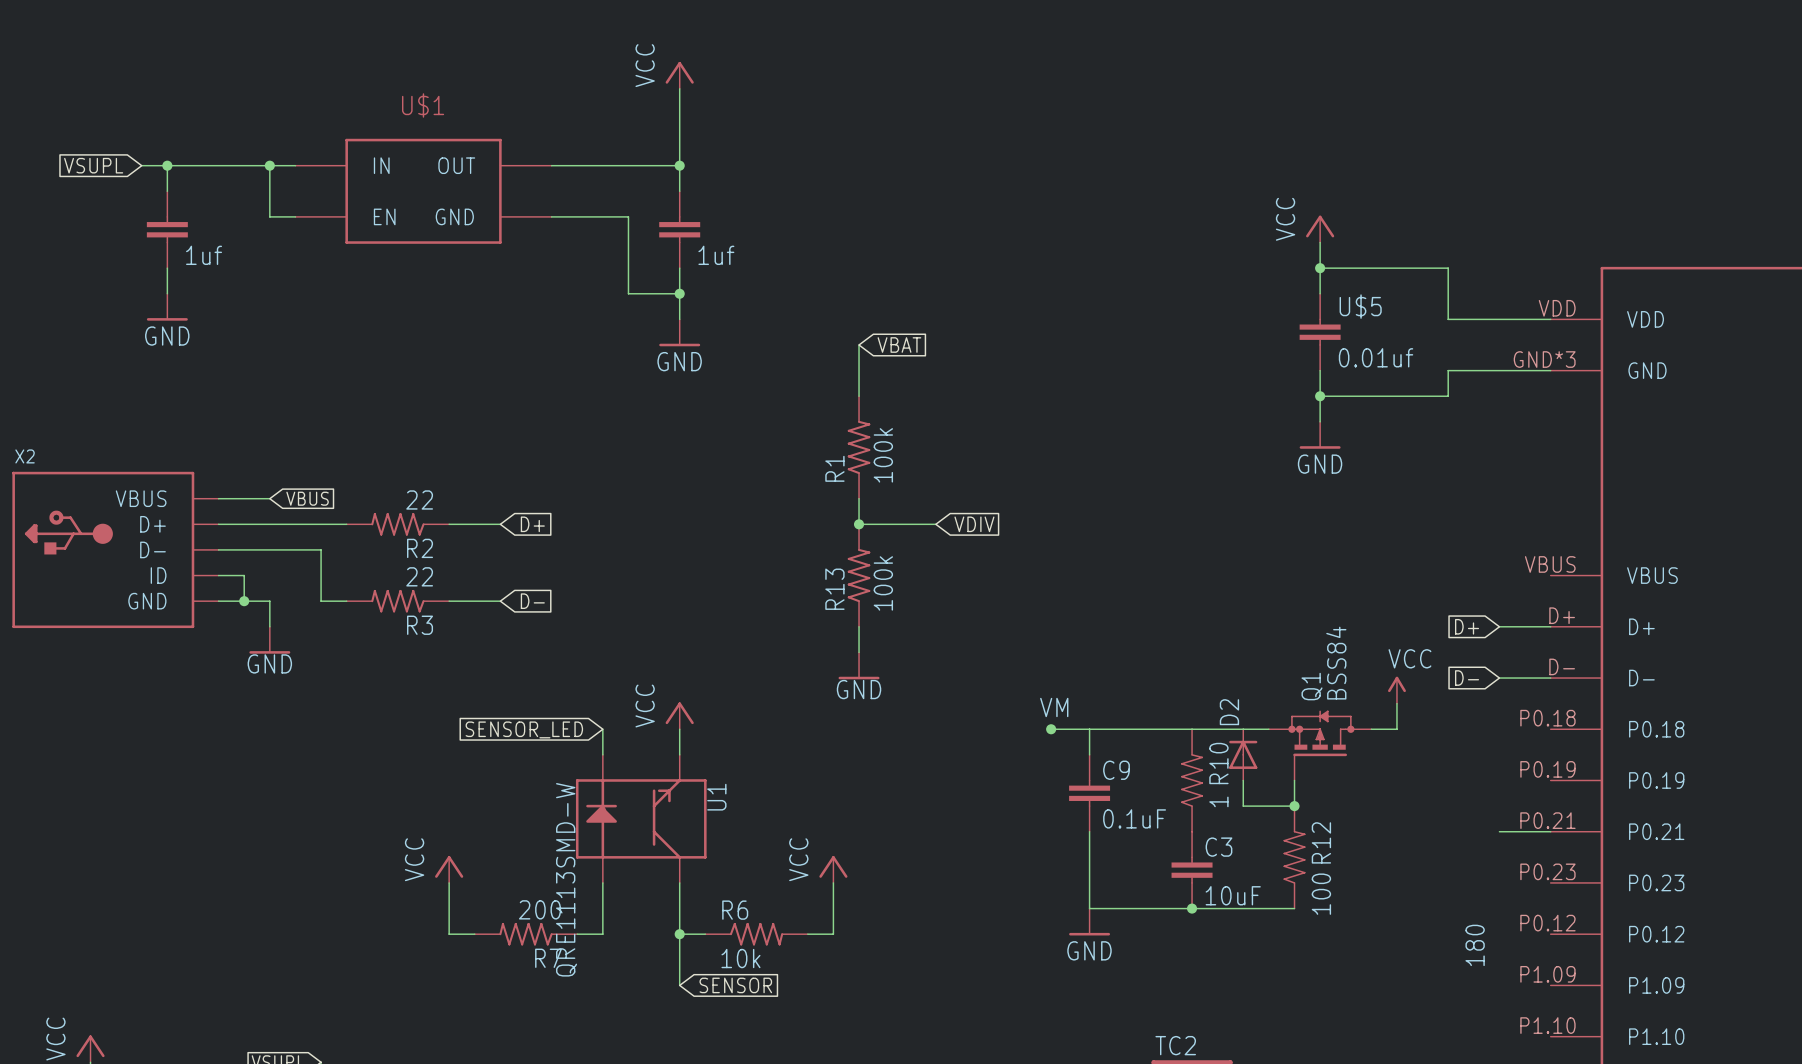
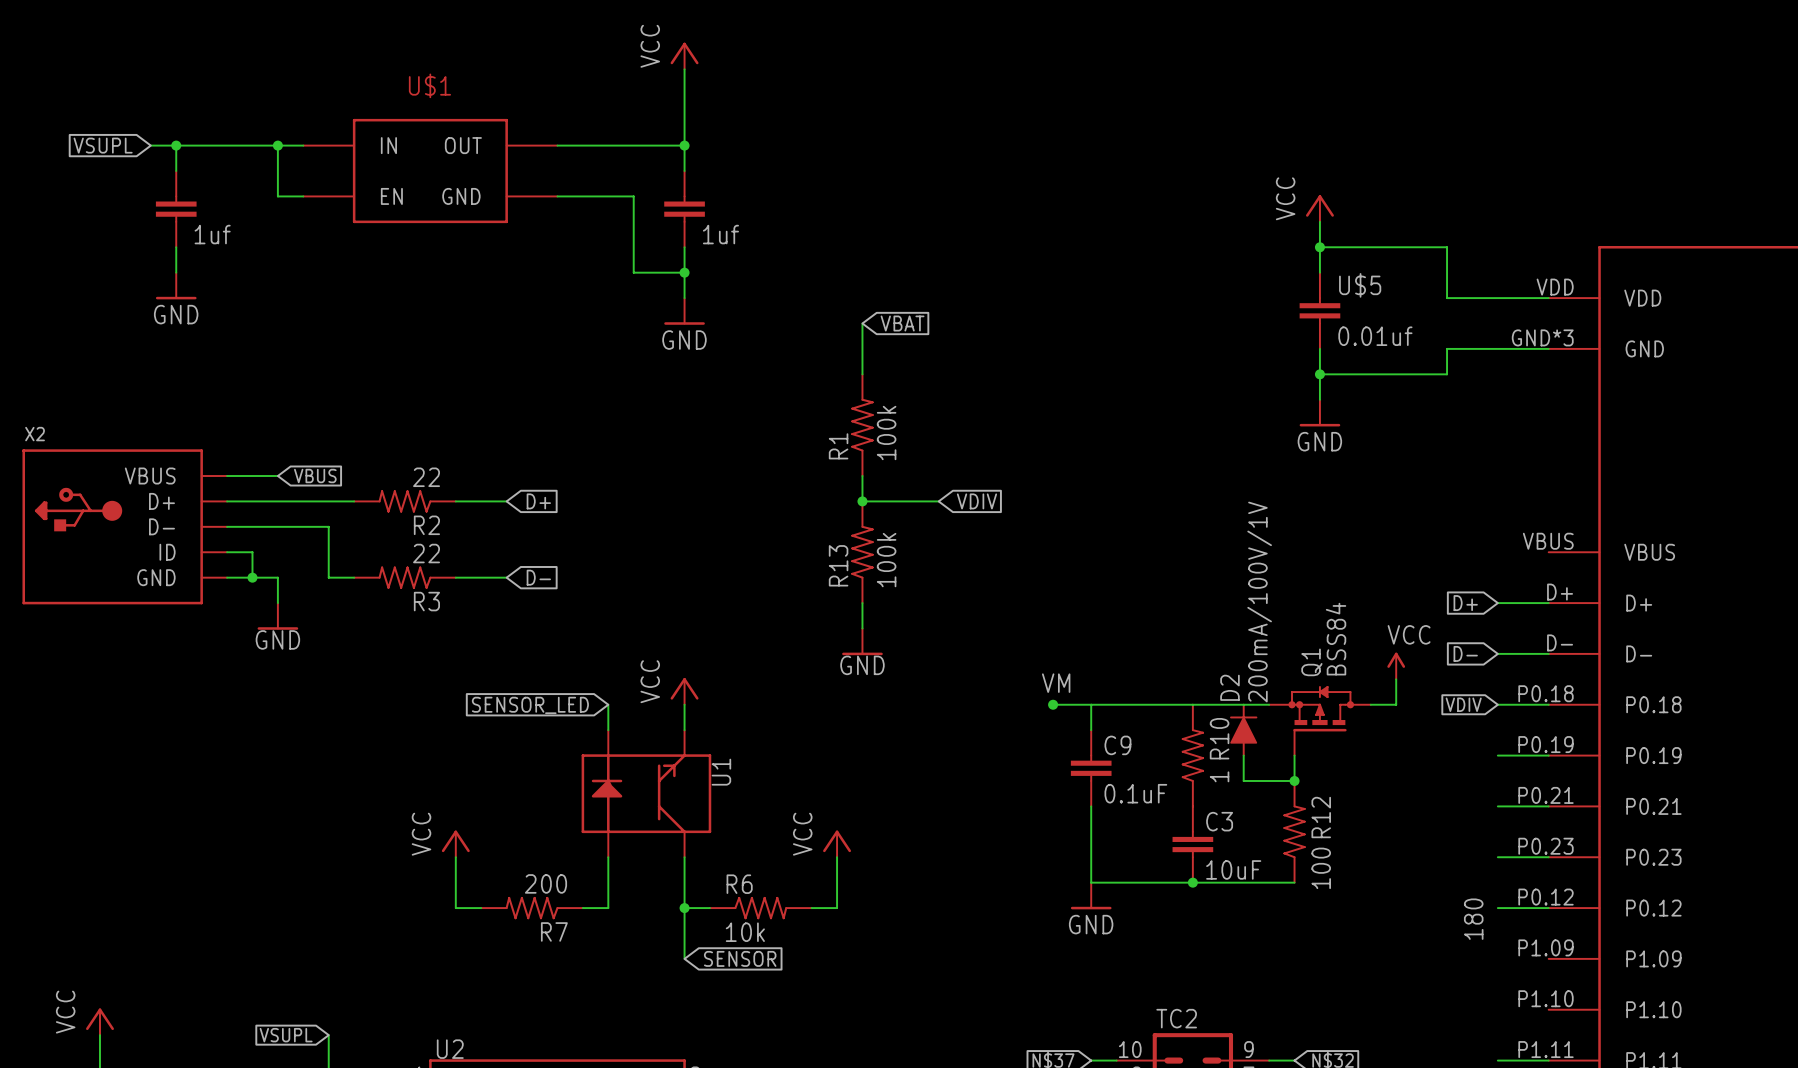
D2 value: none -> 200mA/100V/1V (1259, 602)
D2 symbol: [1229, 729, 1258, 781] -> [1230, 703, 1258, 757]
global label: none -> VDIV (1463, 704)
wire: none -> (1497, 704) (1548, 704)
wire: none -> (1497, 755) (1548, 755)
U1 value: QRE1113SMD-W (566, 879) -> none
wire: none -> (1497, 857) (1548, 857)
wire: none -> (1497, 908) (1548, 908)

